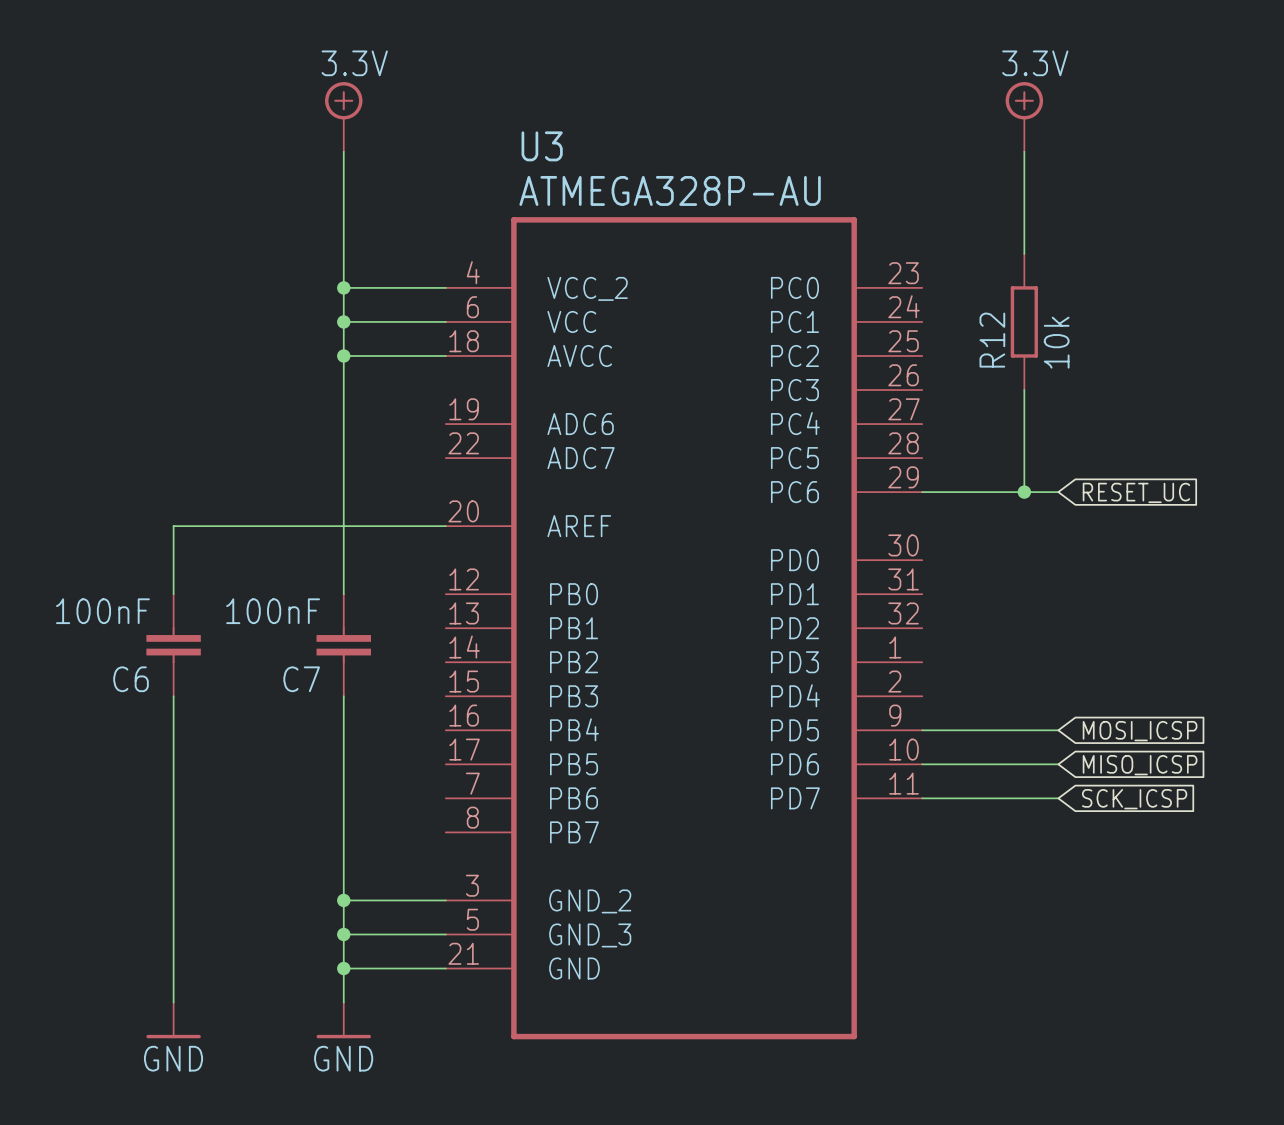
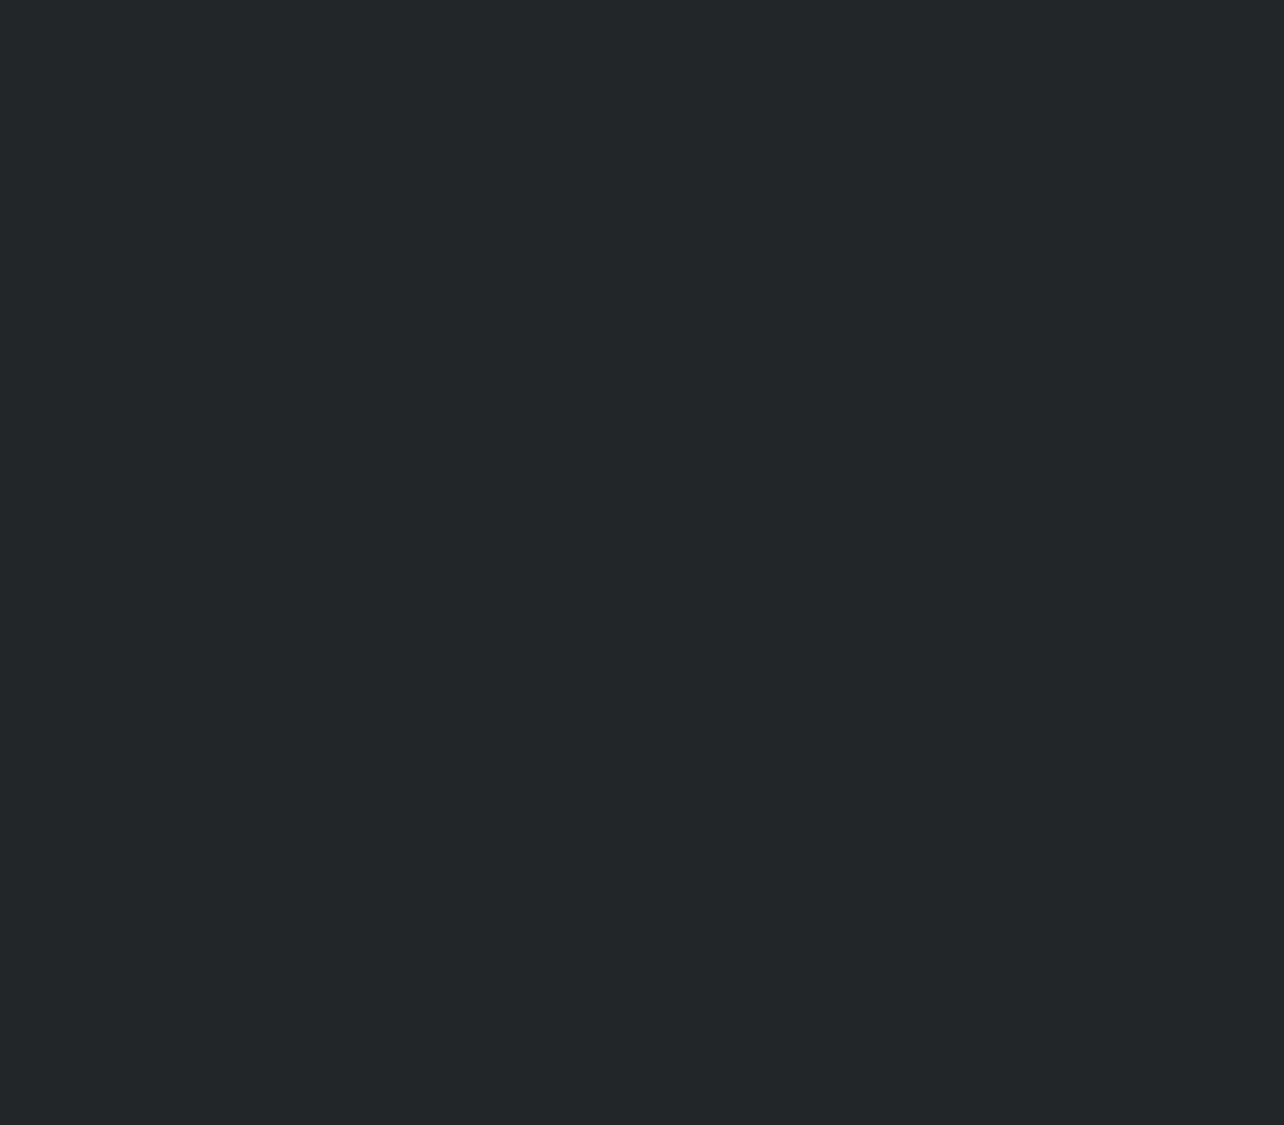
power symbol: 3.3V (343, 116) -> none
power symbol: 3.3V (1024, 116) -> none
wire: (343, 151) (343, 594) -> none
wire: (1024, 151) (1024, 253) -> none
wire: (343, 287) (445, 287) -> none
junction: (343, 287) -> none
wire: (343, 321) (445, 321) -> none
junction: (343, 321) -> none
R12: 10k (1024, 321) -> none
wire: (343, 355) (445, 355) -> none
junction: (343, 355) -> none
wire: (1024, 390) (1024, 492) -> none
wire: (922, 492) (1058, 492) -> none
junction: (1024, 492) -> none
global label: RESET_UC (1136, 492) -> none
wire: (445, 526) (173, 526) (173, 594) -> none
U3: ATMEGA328P-AU (684, 628) -> none
C6: 100nF (173, 645) -> none
C7: 100nF (343, 645) -> none
wire: (173, 696) (173, 1002) -> none
wire: (343, 696) (343, 1002) -> none
wire: (922, 730) (1058, 730) -> none
global label: MOSI_ICSP (1140, 731) -> none
wire: (922, 764) (1058, 764) -> none
global label: MISO_ICSP (1140, 765) -> none
wire: (922, 798) (1058, 798) -> none
global label: SCK_ICSP (1134, 799) -> none
wire: (343, 900) (445, 900) -> none
junction: (343, 900) -> none
wire: (343, 934) (445, 934) -> none
junction: (343, 934) -> none
wire: (343, 968) (445, 968) -> none
junction: (343, 968) -> none
power symbol: GND (173, 1020) -> none
power symbol: GND (343, 1020) -> none

